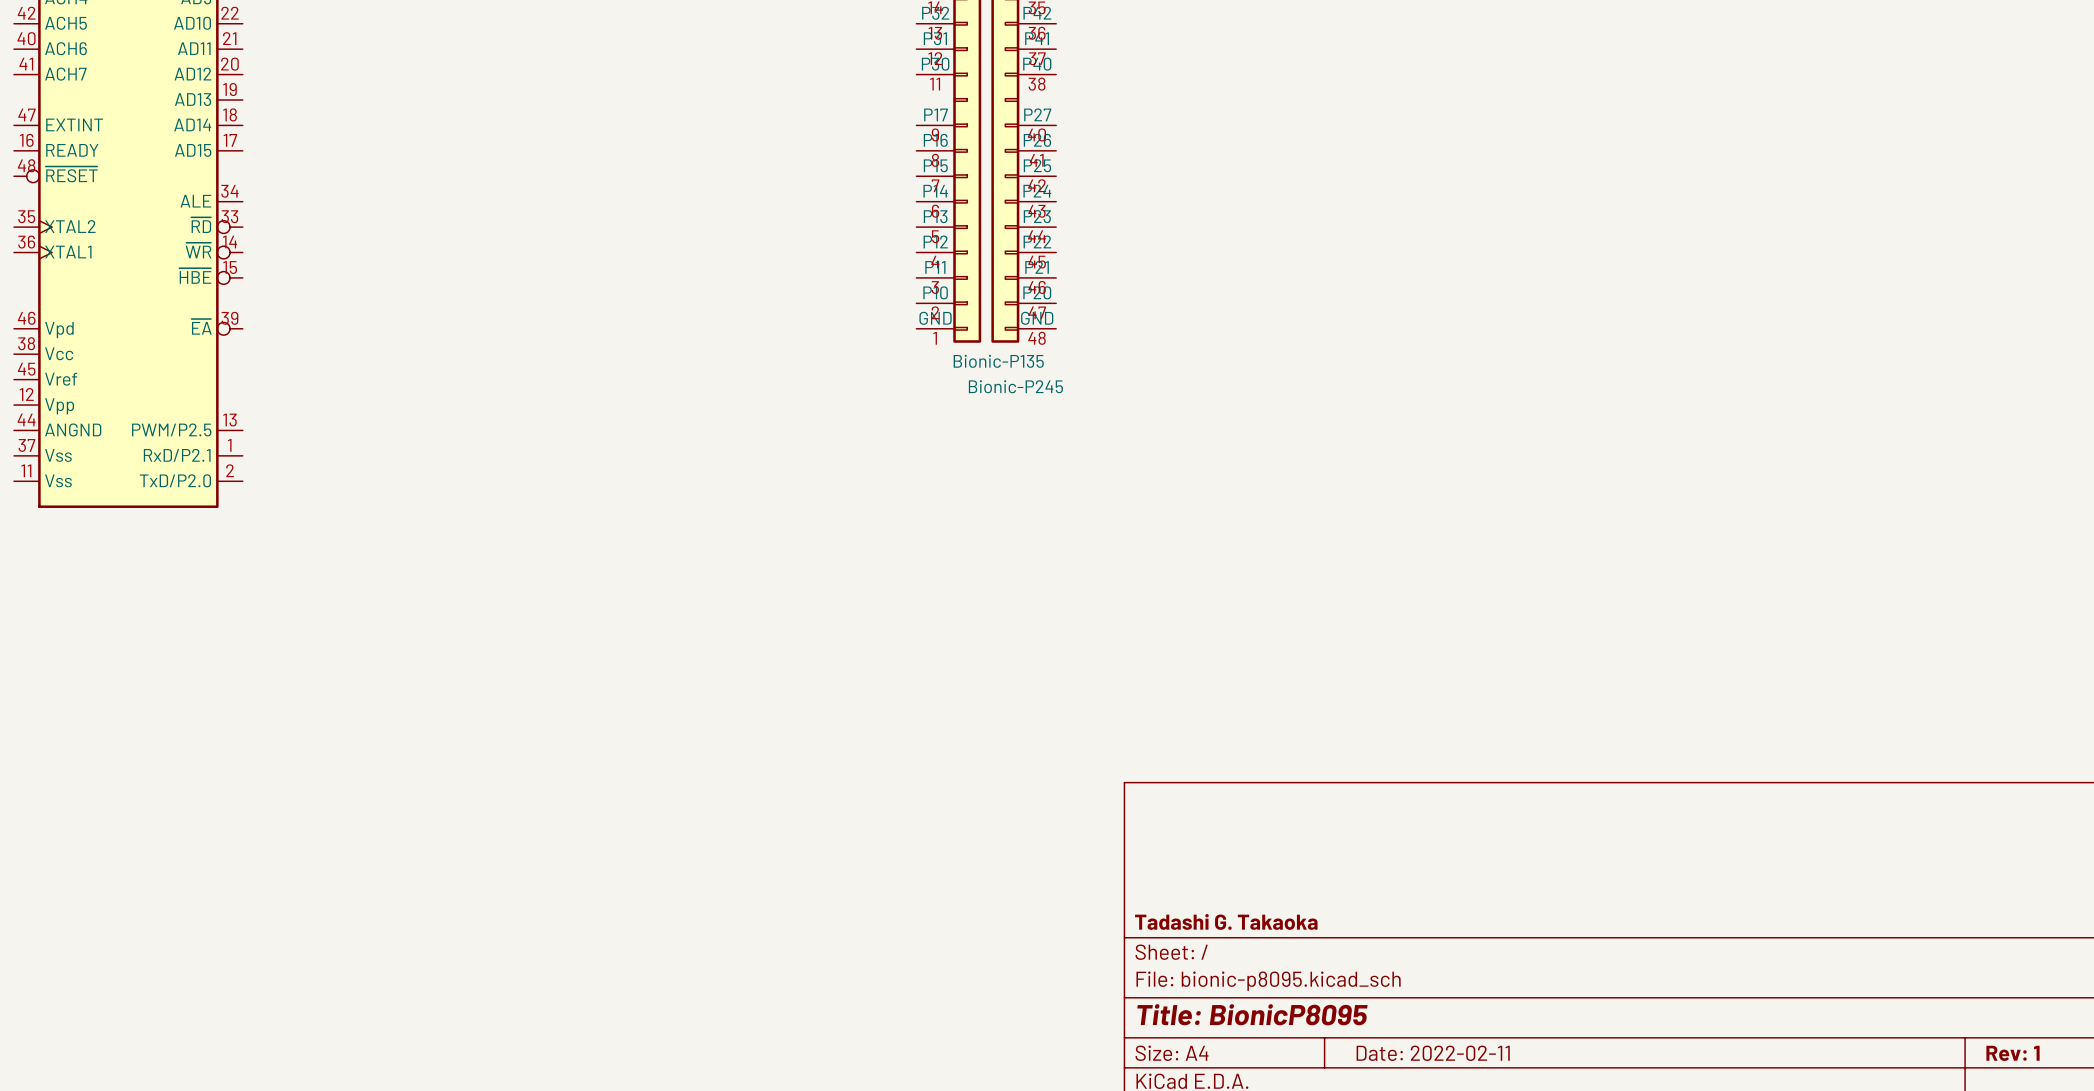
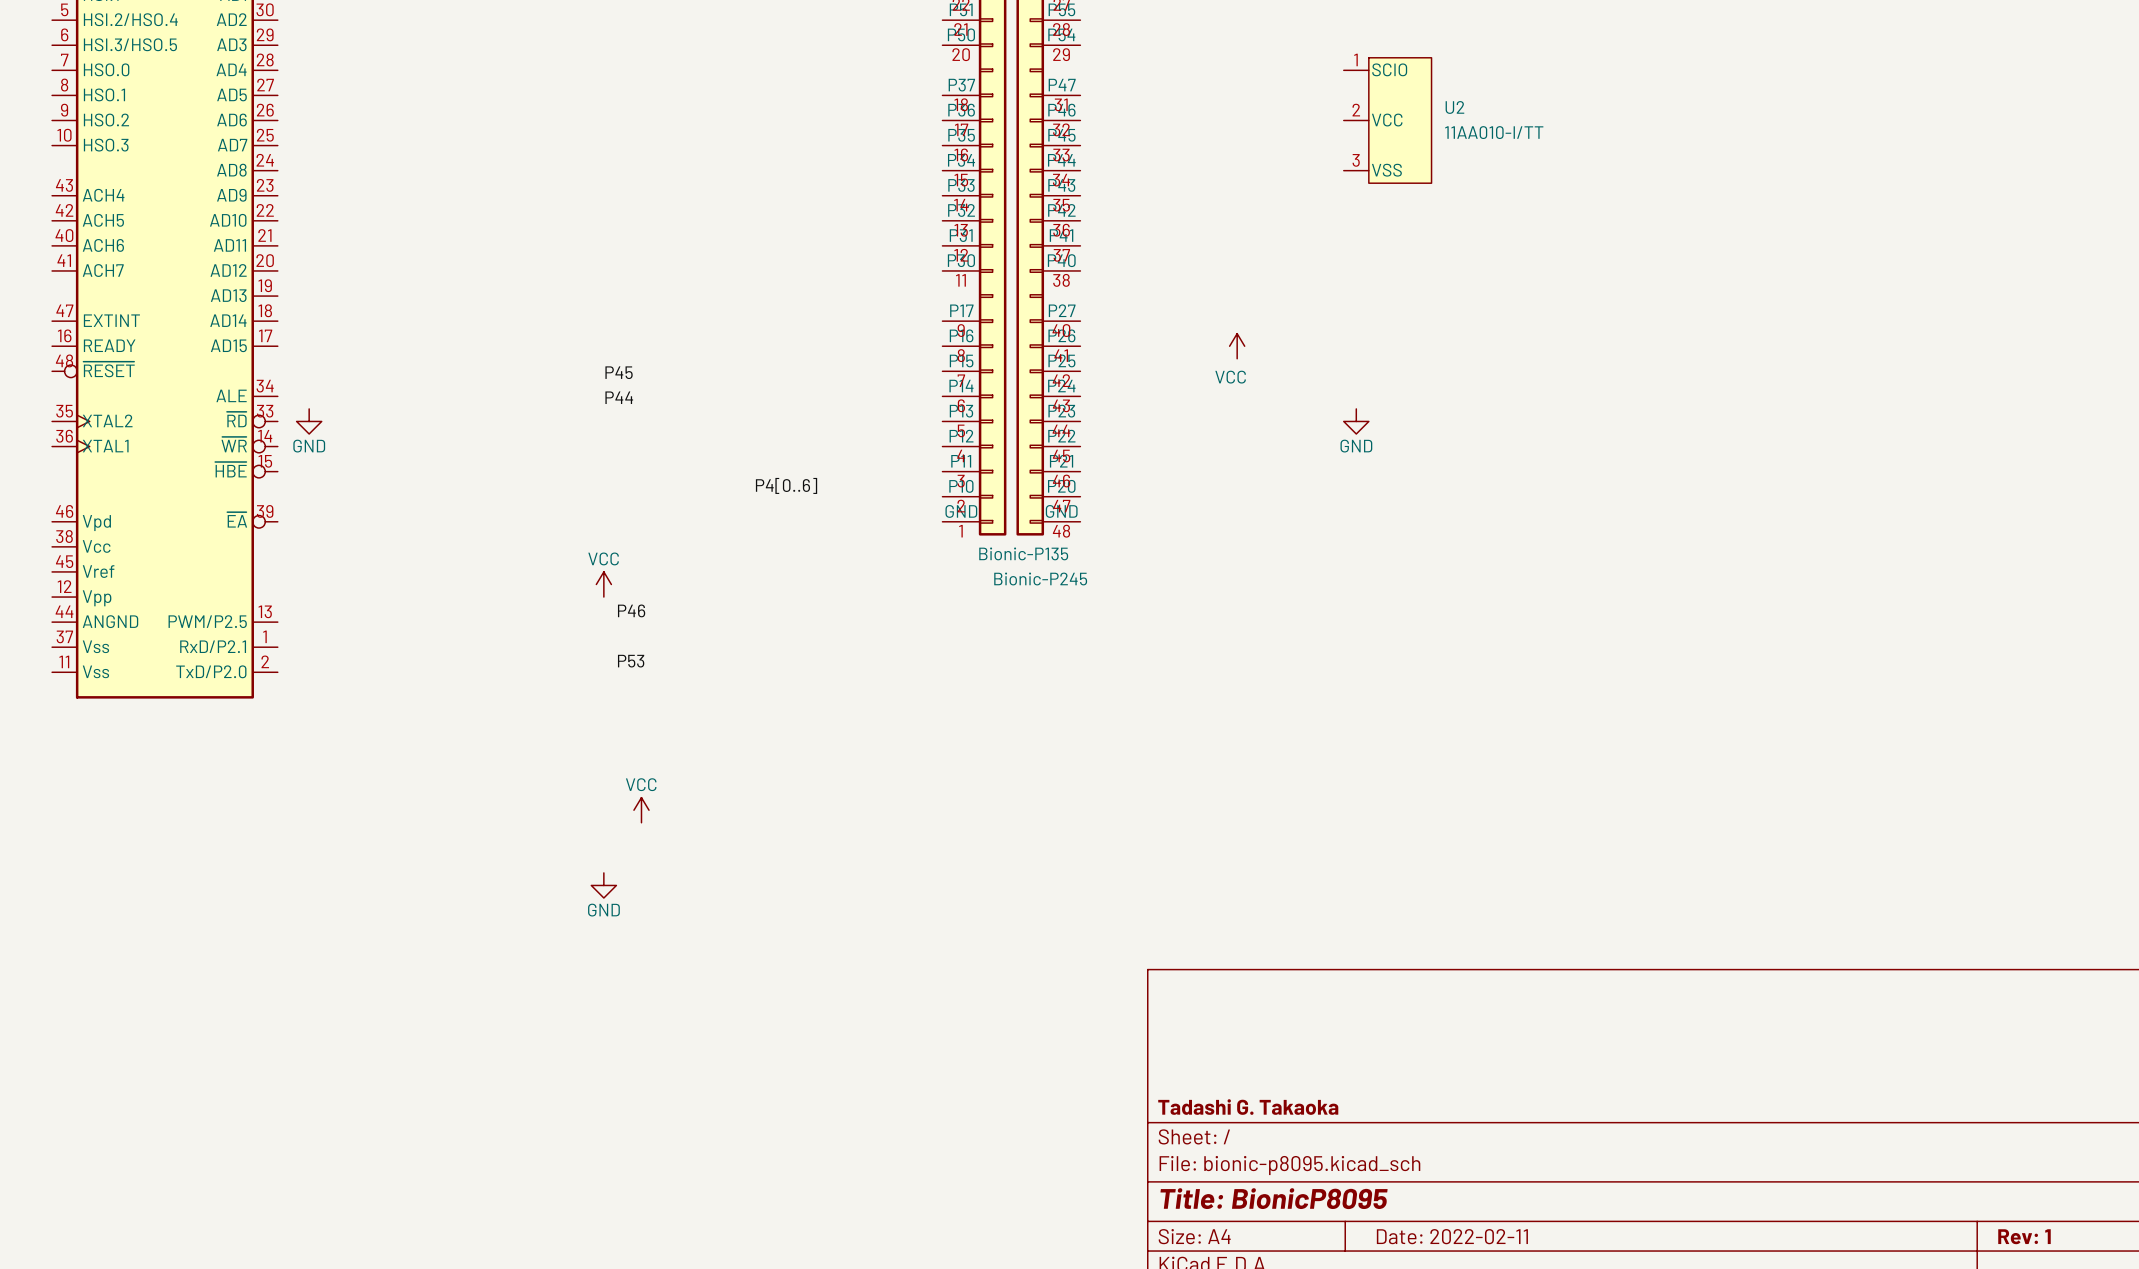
power symbol: none -> VCC (1237, 346)
label: none -> P45 (619, 372)
label: none -> P44 (619, 397)
power symbol: none -> GND (309, 421)
power symbol: none -> GND (1356, 421)
label: none -> P4[0..6] (786, 485)
power symbol: none -> VCC (603, 584)
label: none -> P46 (631, 610)
label: none -> P53 (631, 661)
power symbol: none -> VCC (641, 810)
power symbol: none -> GND (603, 885)

